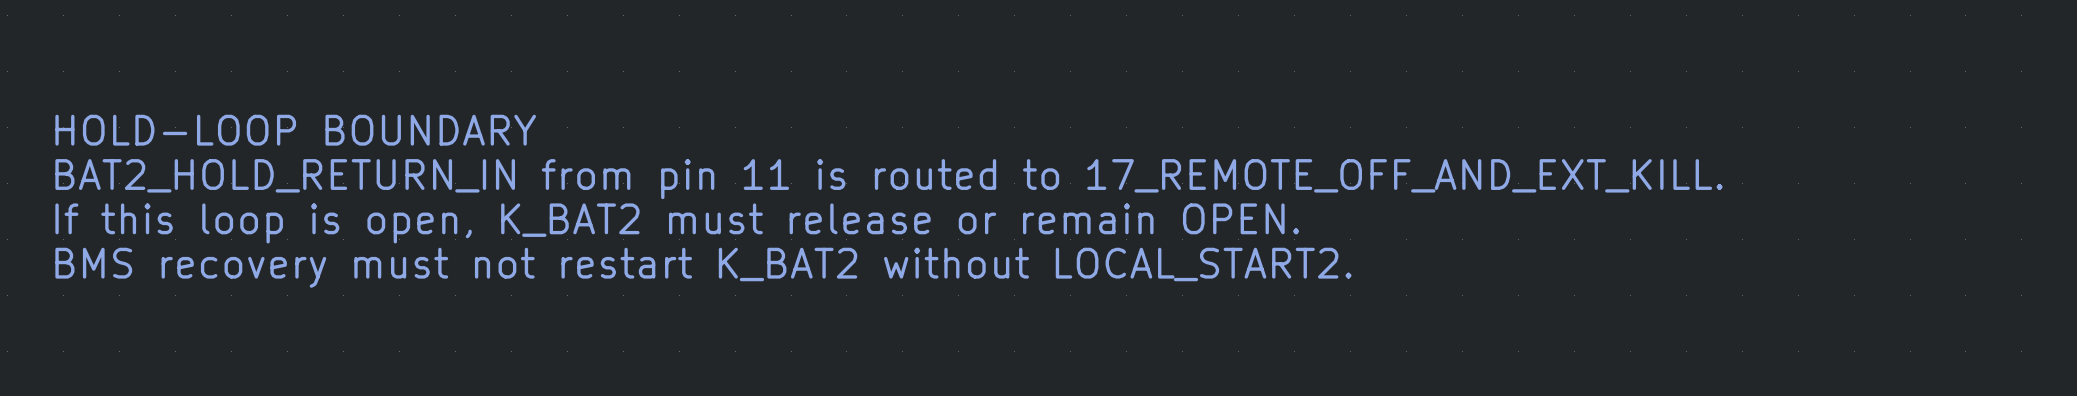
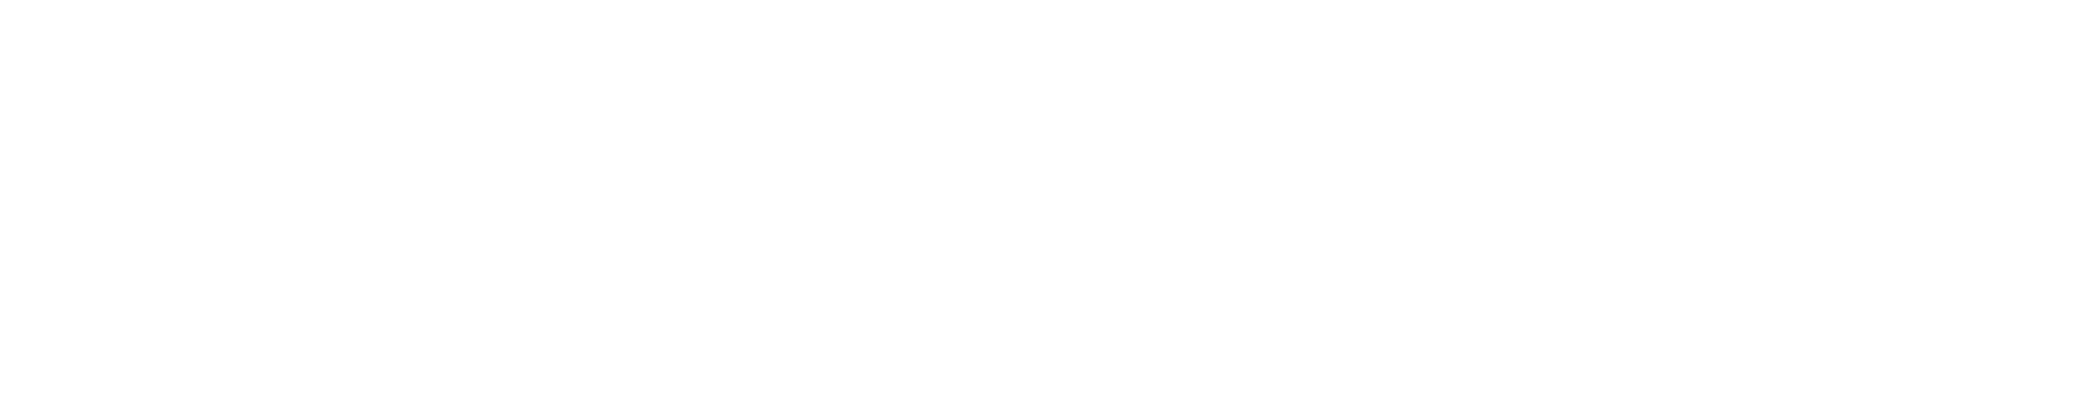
text: HOLD-LOOP BOUNDARY (295, 130) -> none
text: BAT2_HOLD_RETURN_IN from pin 11 is routed to 17_REMOTE_OFF_AND_EXT_KILL. (888, 179) -> none
text: If this loop is open, K_BAT2 must release or remain OPEN. (677, 223) -> none
text: BMS recovery must not restart K_BAT2 without LOCAL_START2. (703, 267) -> none

